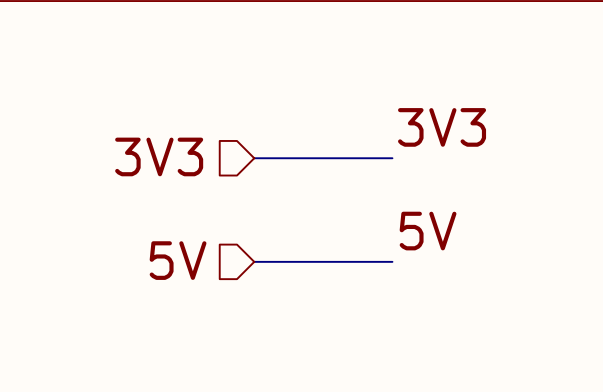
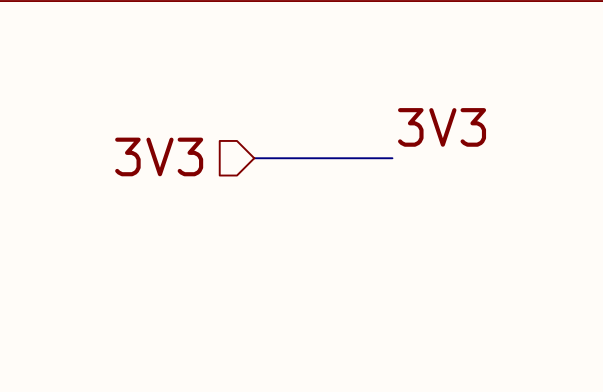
label: 5V (428, 231) -> none
hierarchical label: 5V (178, 260) -> none
wire: (254, 261) (392, 261) -> none

